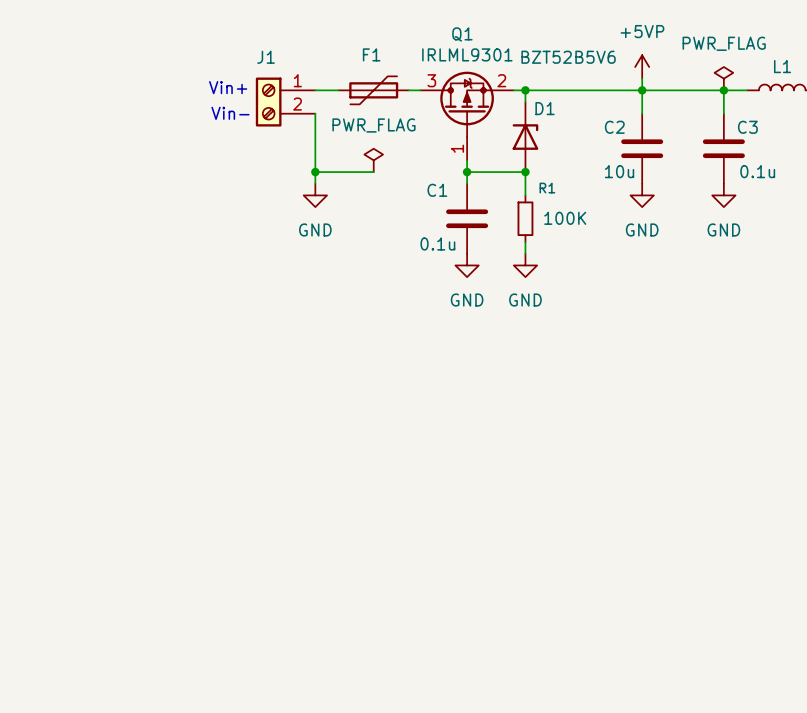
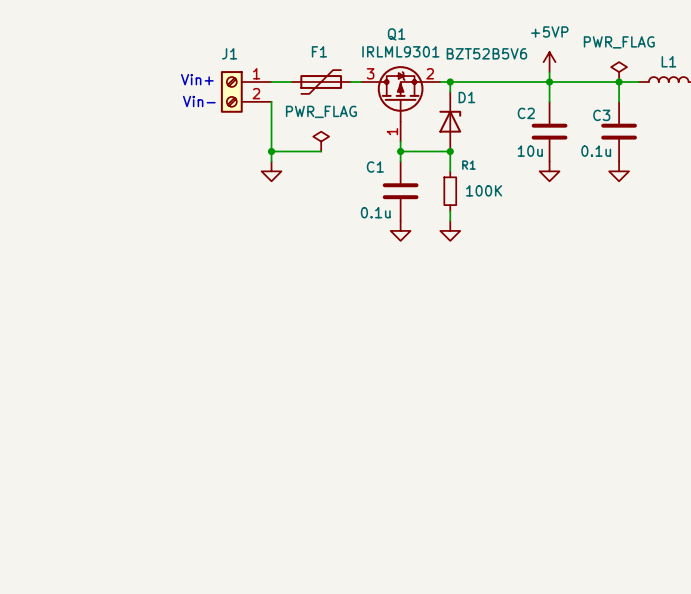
C3 name position: C3 (747, 127) -> C3 (601, 115)
C3 value position: 0.1u (757, 171) -> 0.1u (596, 151)
power symbol text: GND (315, 229) -> none
power symbol text: GND (642, 229) -> none
power symbol text: GND (723, 229) -> none
power symbol text: GND (467, 300) -> none
power symbol text: GND (525, 300) -> none

